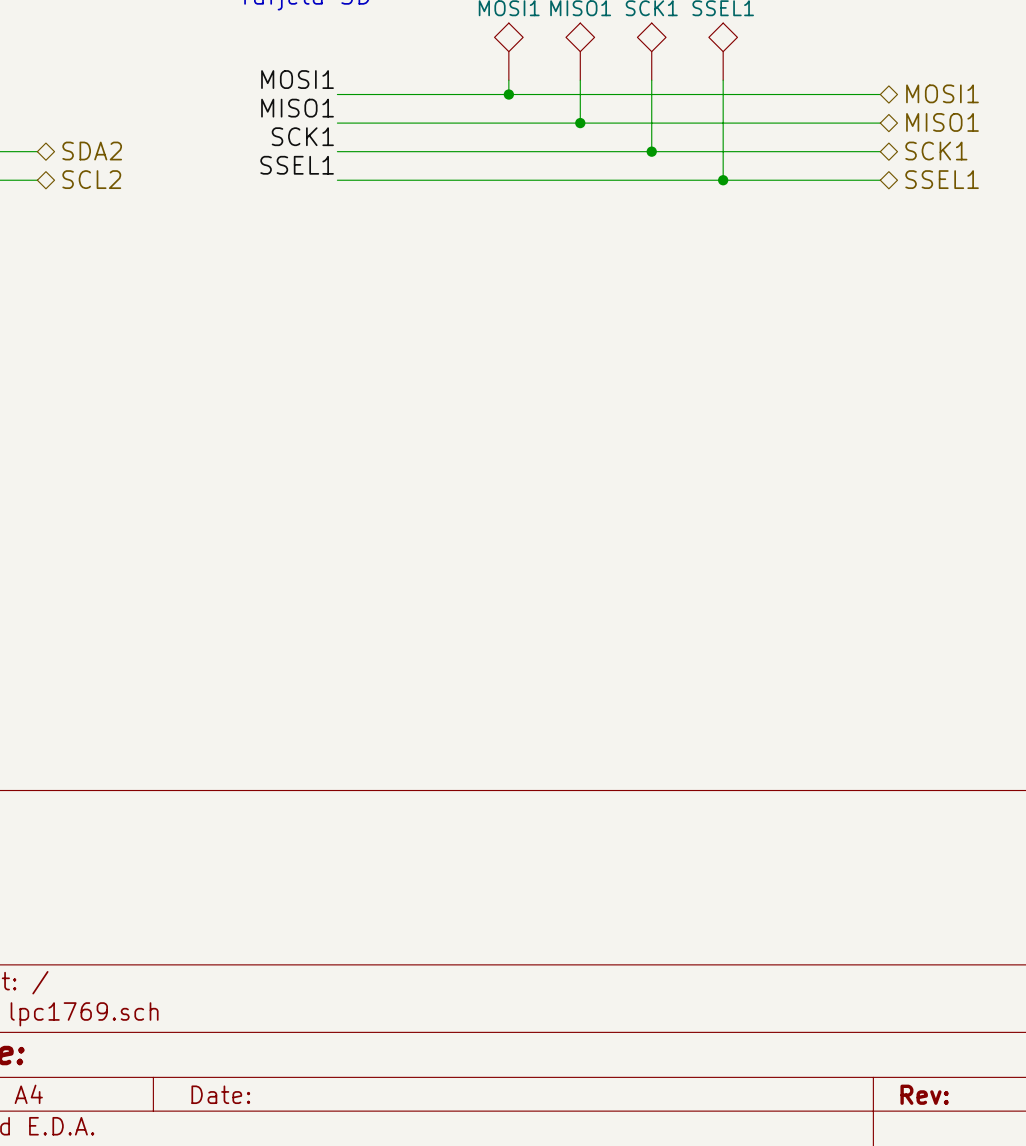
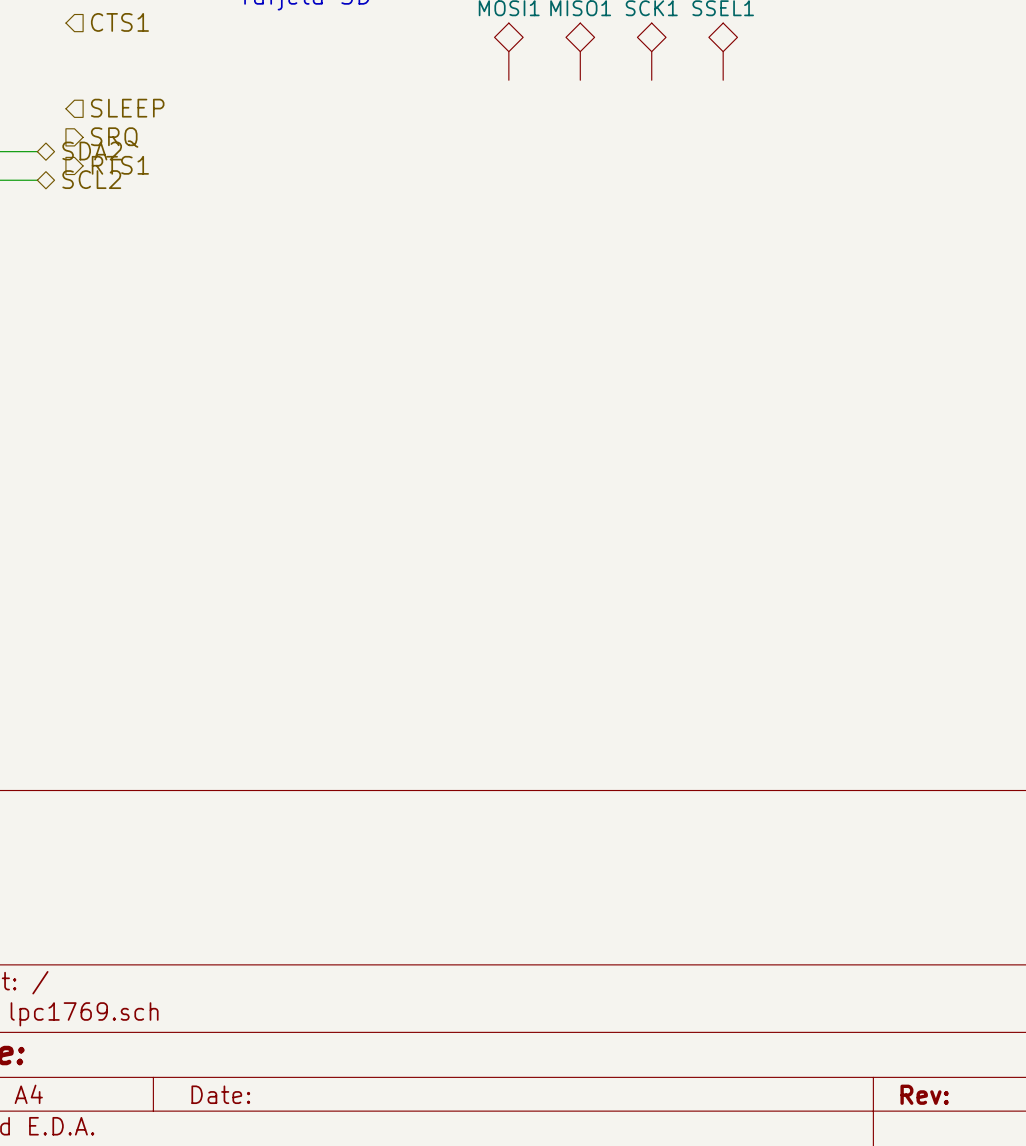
hierarchical label: none -> CTS1 (119, 22)
label: MOSI1 (297, 79) -> none
wire: (508, 80) (508, 94) -> none
wire: (580, 80) (580, 123) -> none
wire: (651, 80) (651, 151) -> none
wire: (723, 80) (723, 180) -> none
hierarchical label: MOSI1 (942, 93) -> none
wire: (337, 94) (880, 94) -> none
junction: (508, 94) -> none
hierarchical label: none -> SLEEP (127, 108)
label: MISO1 (297, 108) -> none
hierarchical label: MISO1 (942, 122) -> none
wire: (337, 123) (880, 123) -> none
junction: (580, 123) -> none
label: SCK1 (302, 136) -> none
hierarchical label: none -> SRQ (114, 137)
wire: (337, 151) (880, 151) -> none
junction: (651, 151) -> none
hierarchical label: SCK1 (936, 151) -> none
hierarchical label: none -> RTS1 (120, 165)
label: SSEL1 (297, 165) -> none
hierarchical label: SSEL1 (942, 179) -> none
wire: (337, 180) (880, 180) -> none
junction: (723, 180) -> none

